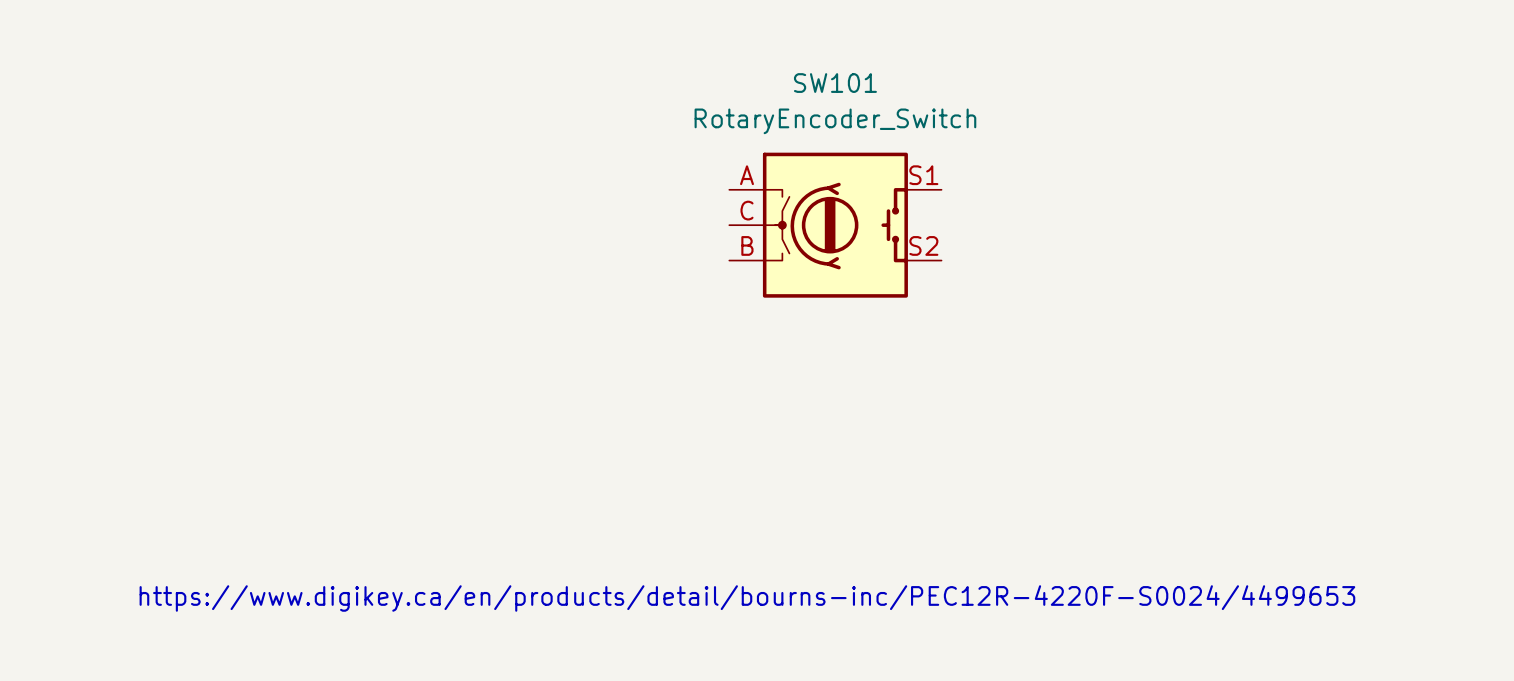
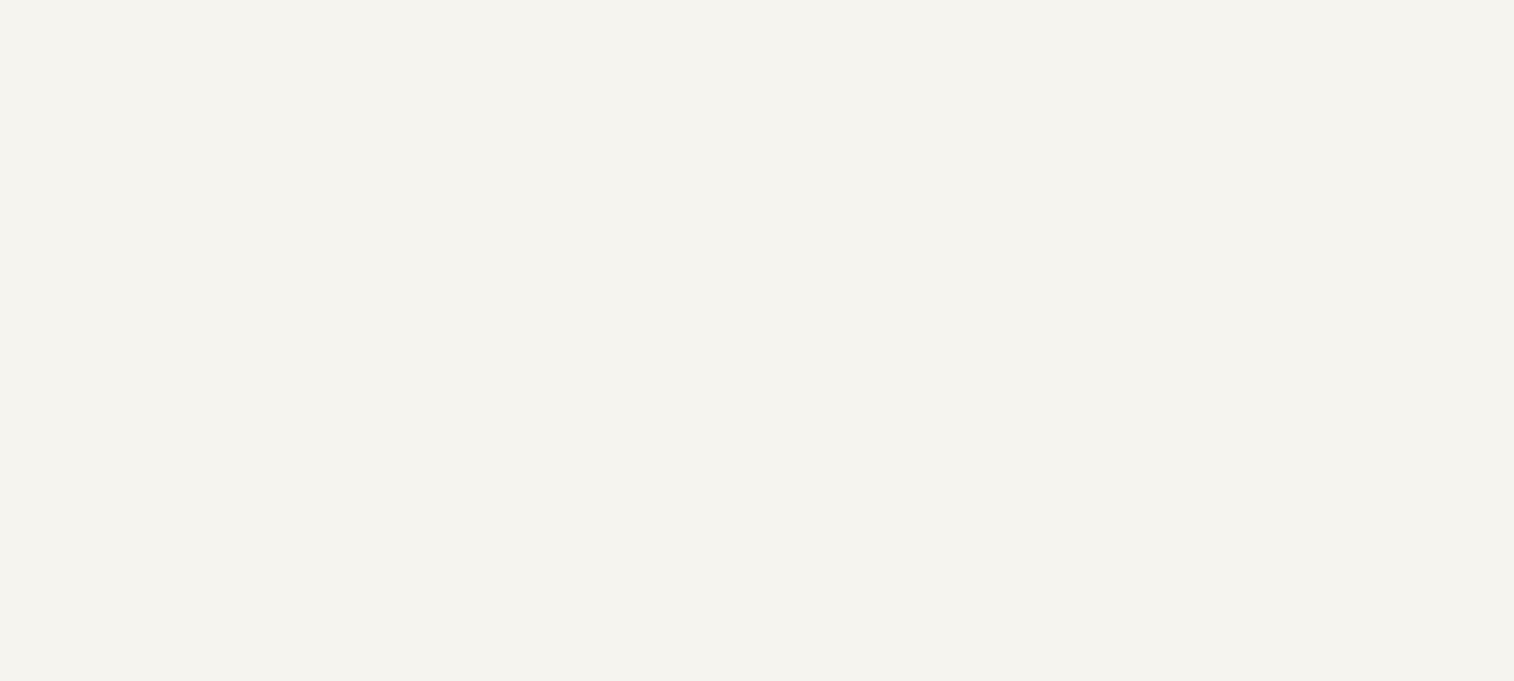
SW101: RotaryEncoder_Switch (835, 225) -> none
text: https://www.digikey.ca/en/products/detail/bourns-inc/PEC12R-4220F-S0024/4499653 (747, 598) -> none

